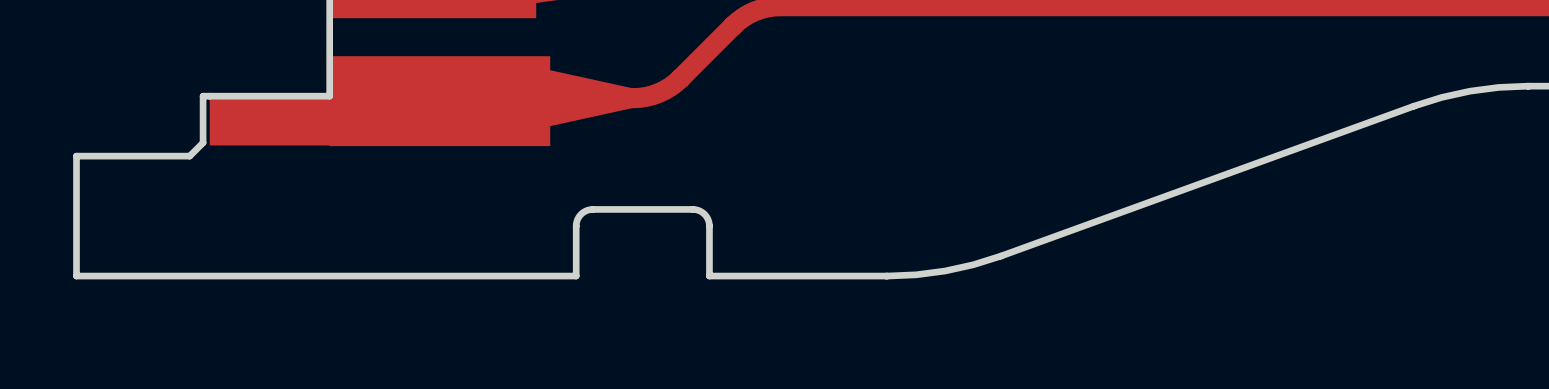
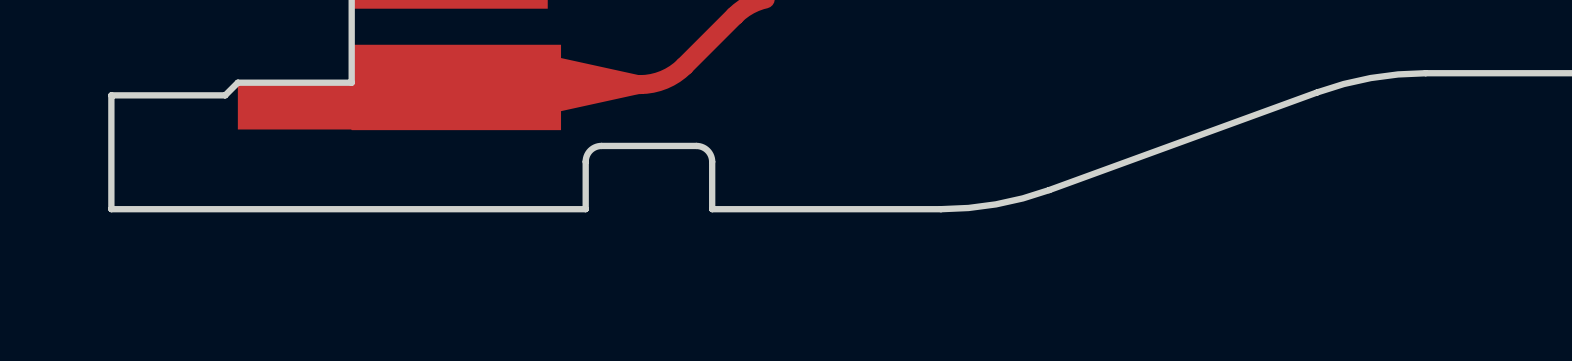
board edge: (1527, 86) (1469, 91) (1413, 106) (1001, 256) (945, 271) (887, 276) (709, 276) (709, 229) -> (1488, 73) (1398, 74) (1343, 84) (1049, 190) (995, 204) (940, 209) (712, 209)
board edge: (209, 96) (203, 96) (203, 142) (189, 156) (76, 156) -> (237, 82) (225, 95) (111, 95) (111, 139)
board edge: (576, 226) (581, 214) (592, 209) (694, 209) (705, 215) (709, 226) -> (585, 206) (586, 158) (591, 149) (601, 145) (703, 147) (708, 151) (712, 159) (712, 206)
board edge: (76, 229) (76, 276) (576, 276) (576, 229) -> (111, 209) (585, 209)

